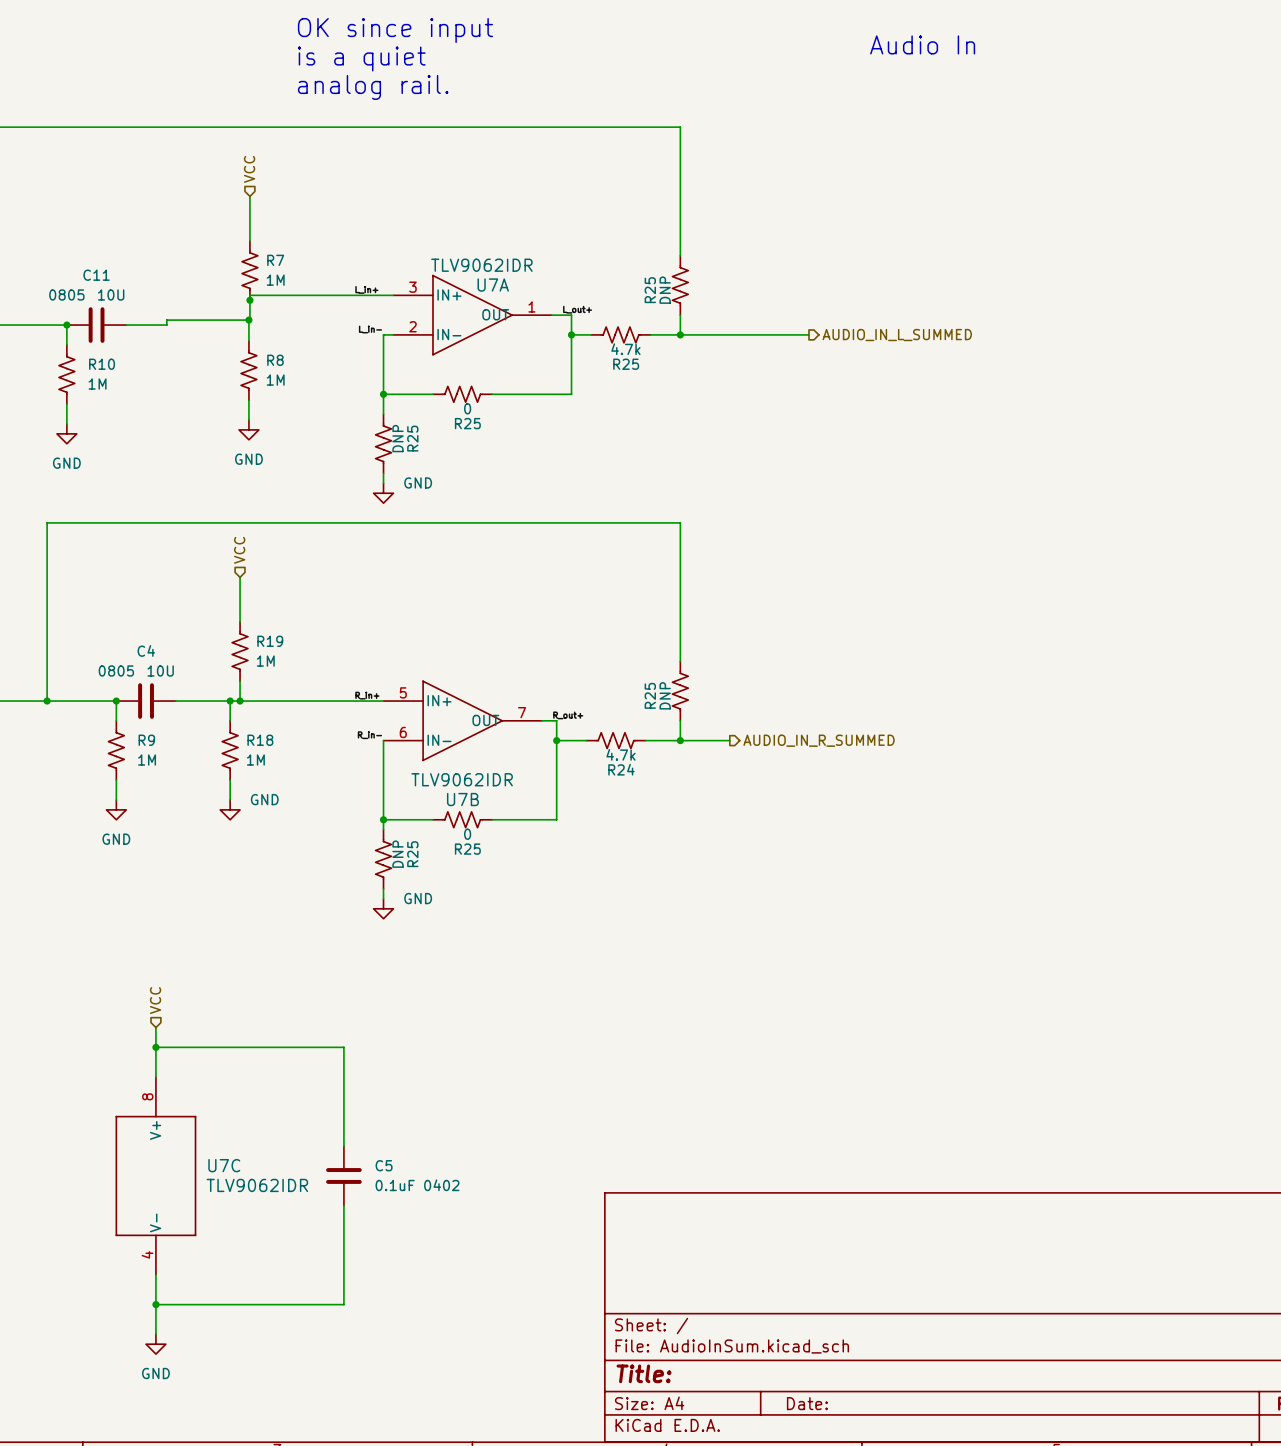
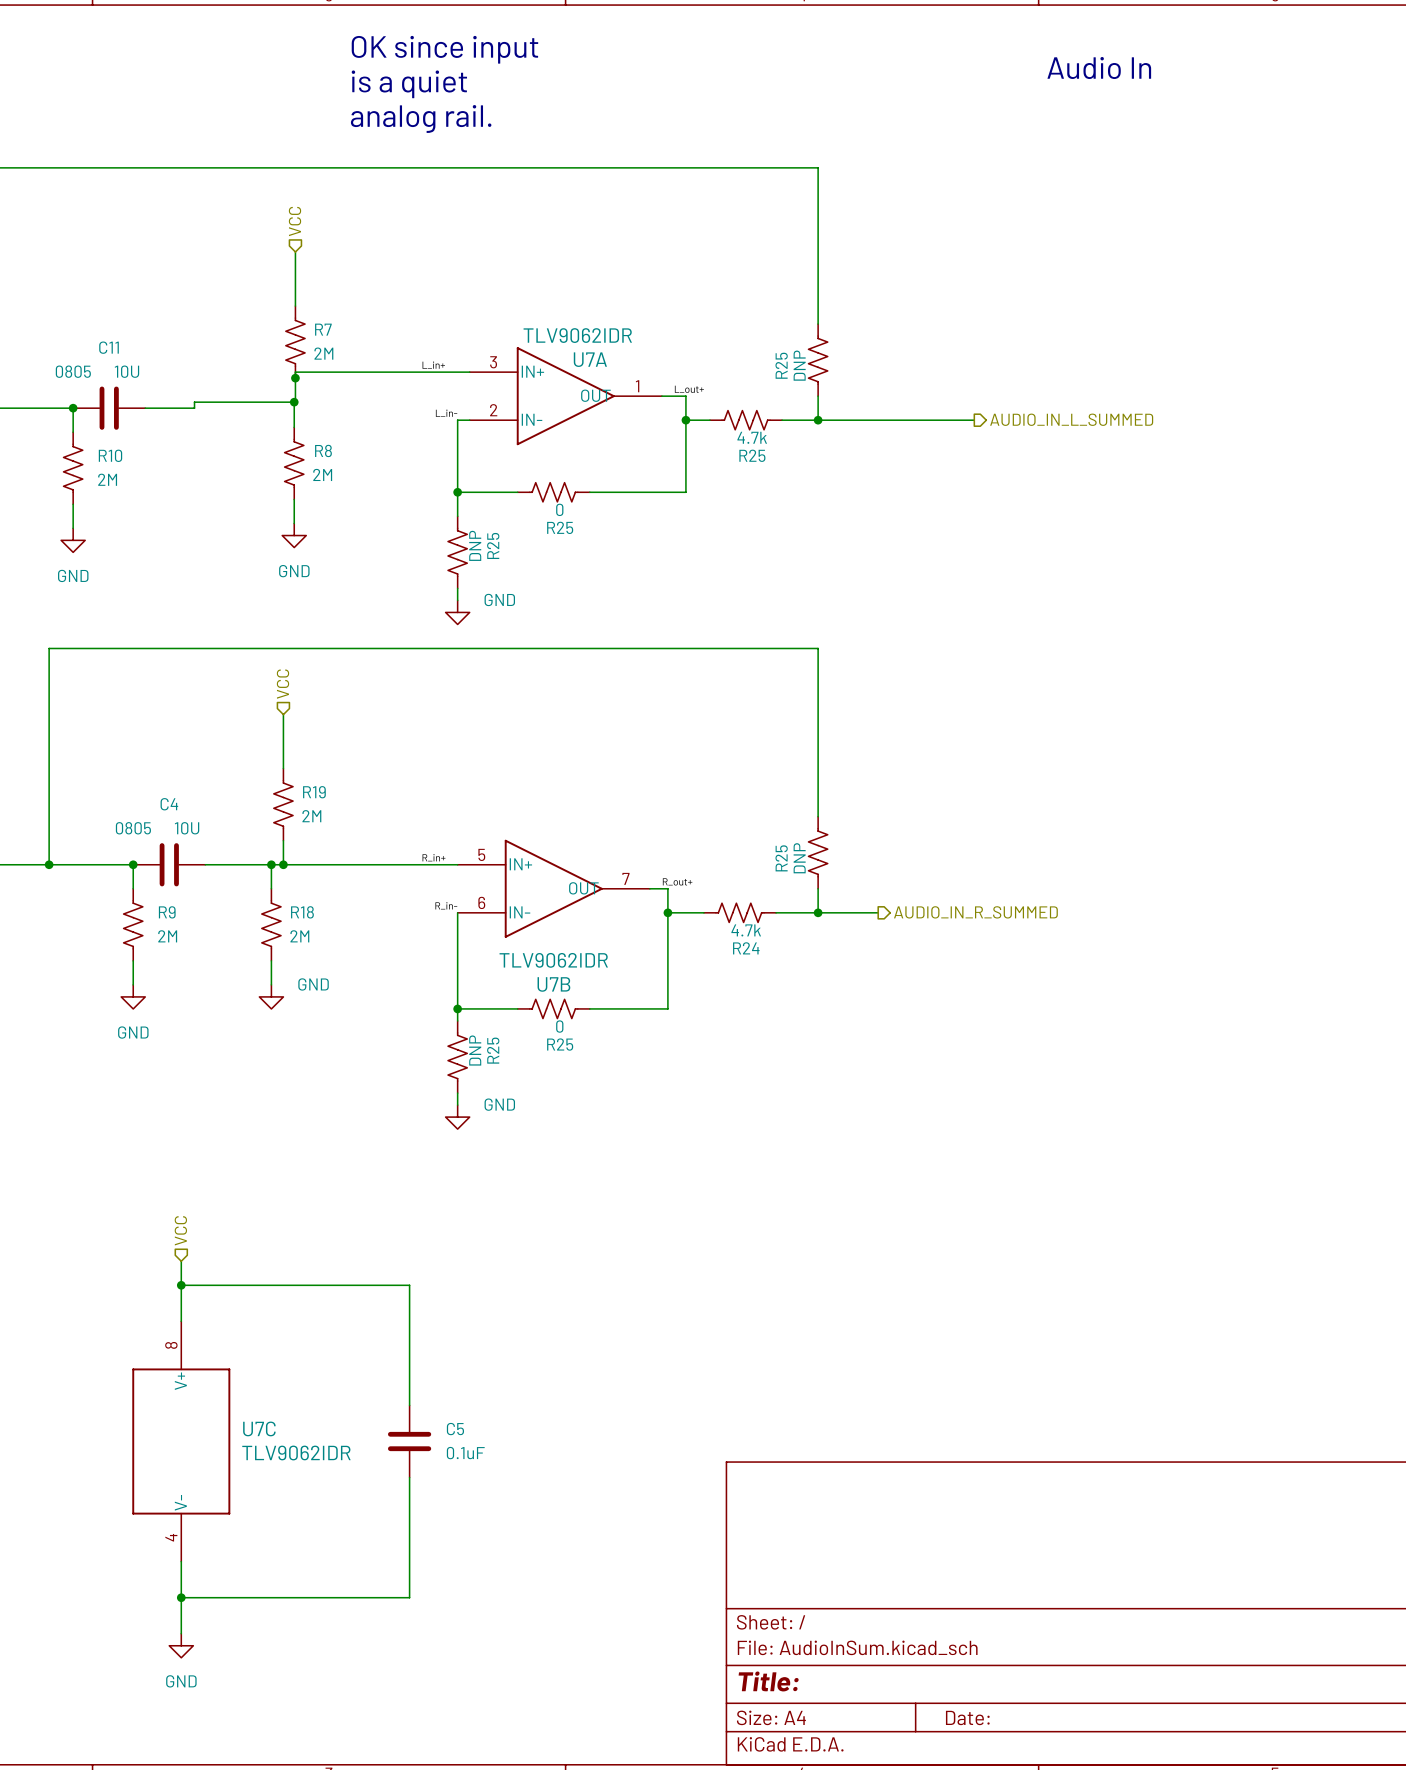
R7 value: 1M (275, 280) -> 2M (323, 353)
R8 value: 1M (275, 380) -> 2M (322, 474)
R10 value: 1M (97, 384) -> 2M (107, 479)
R19 value: 1M (265, 661) -> 2M (311, 816)
R9 value: 1M (147, 760) -> 2M (167, 936)
R18 value: 1M (255, 760) -> 2M (299, 936)
C5 value: 0.1uF 0402 (417, 1185) -> 0.1uF (465, 1453)

